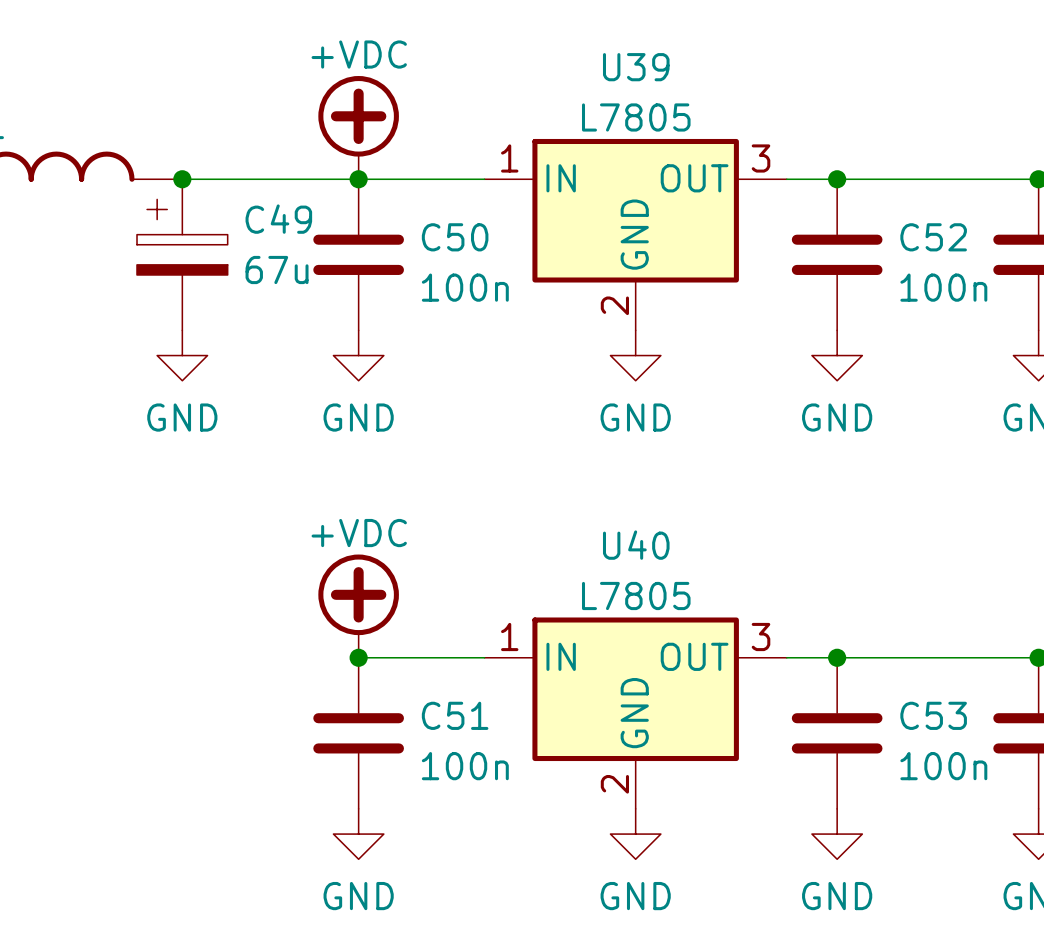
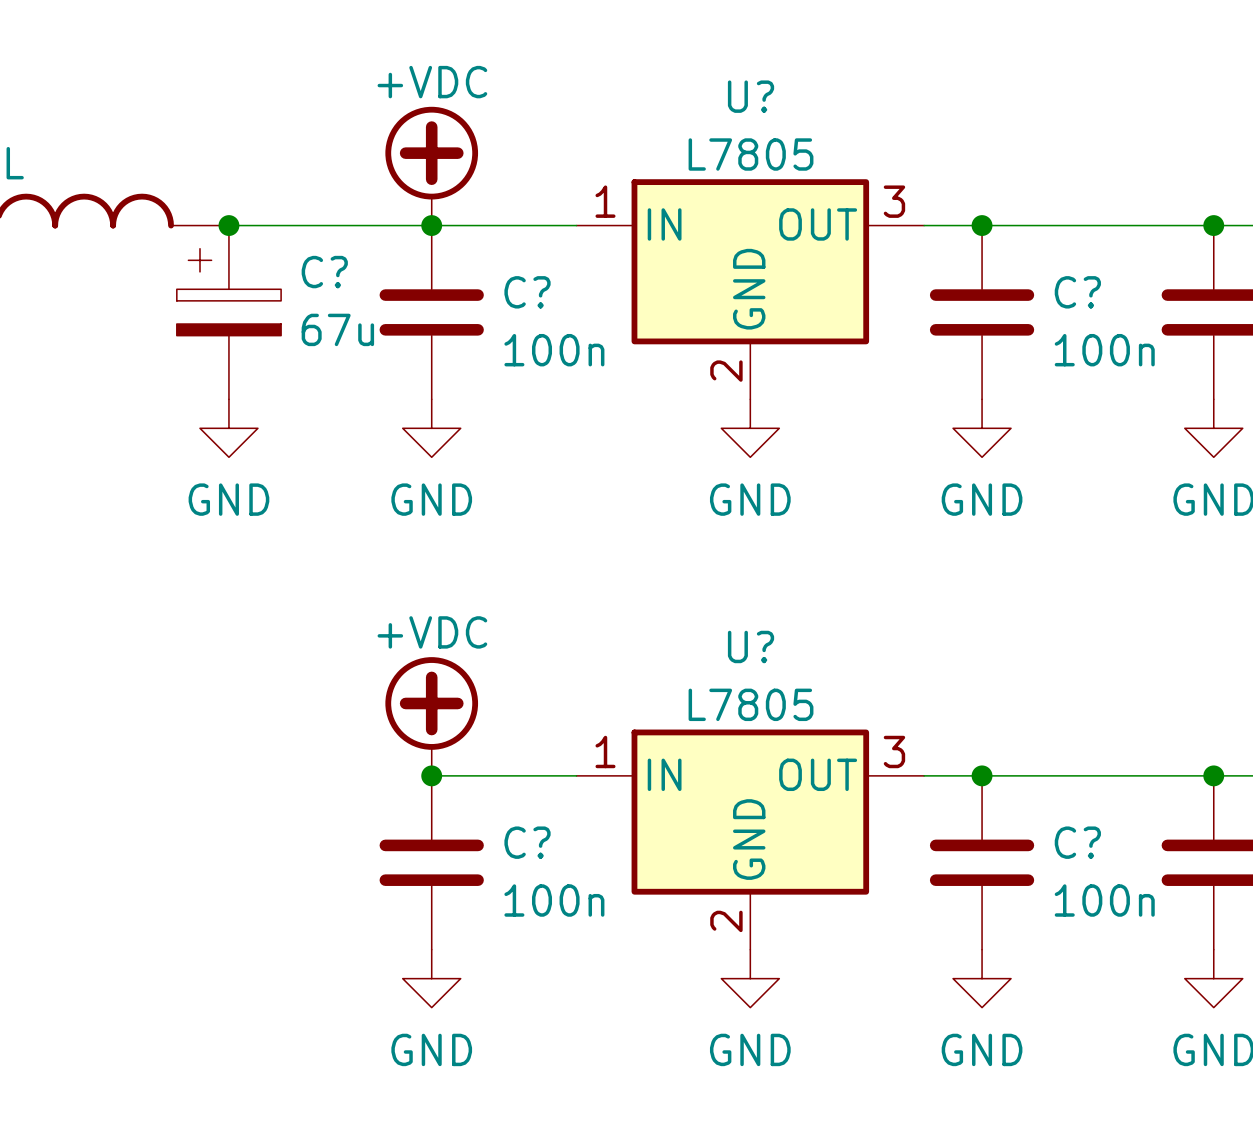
U39 name: U39 (636, 67) -> U? (751, 96)
C49 name: C49 (278, 219) -> C? (324, 272)
C50 name: C50 (455, 237) -> C? (527, 292)
C52 name: C52 (933, 237) -> C? (1077, 292)
U40 name: U40 (636, 545) -> U? (751, 646)
C51 name: C51 (455, 715) -> C? (527, 842)
C53 name: C53 (933, 715) -> C? (1077, 842)

